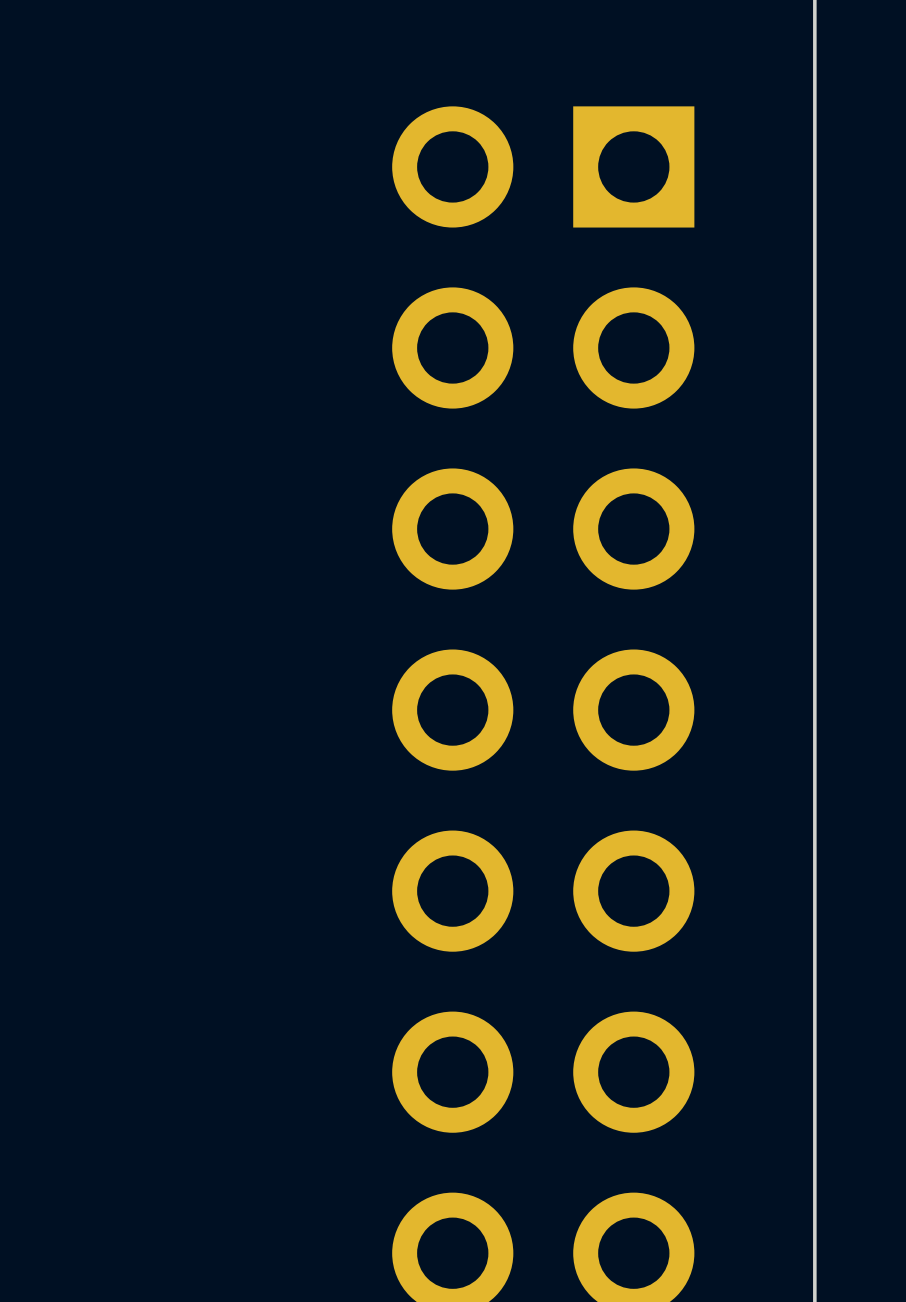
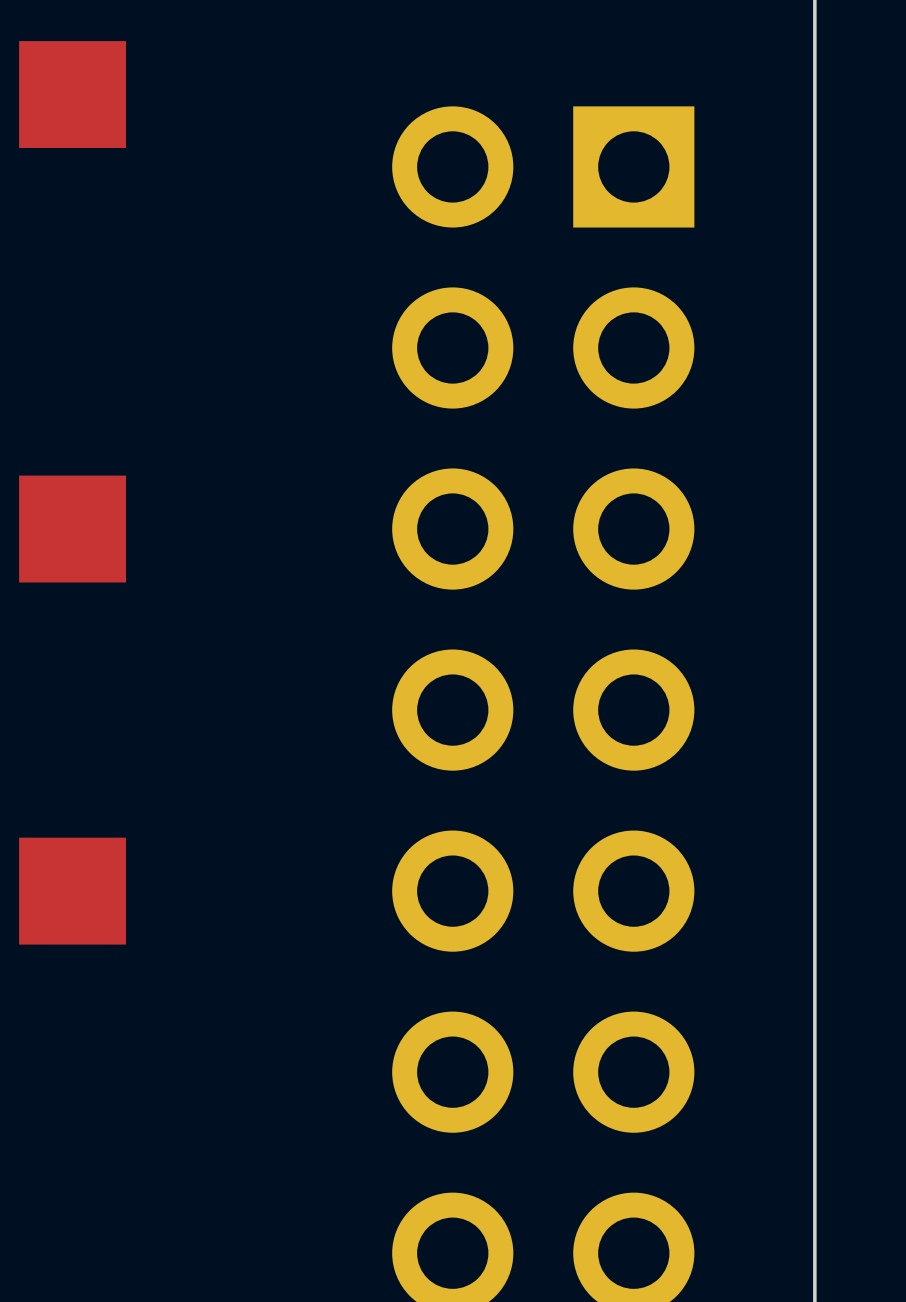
part: none -> (72, 94)
part: none -> (72, 529)
part: none -> (72, 891)

